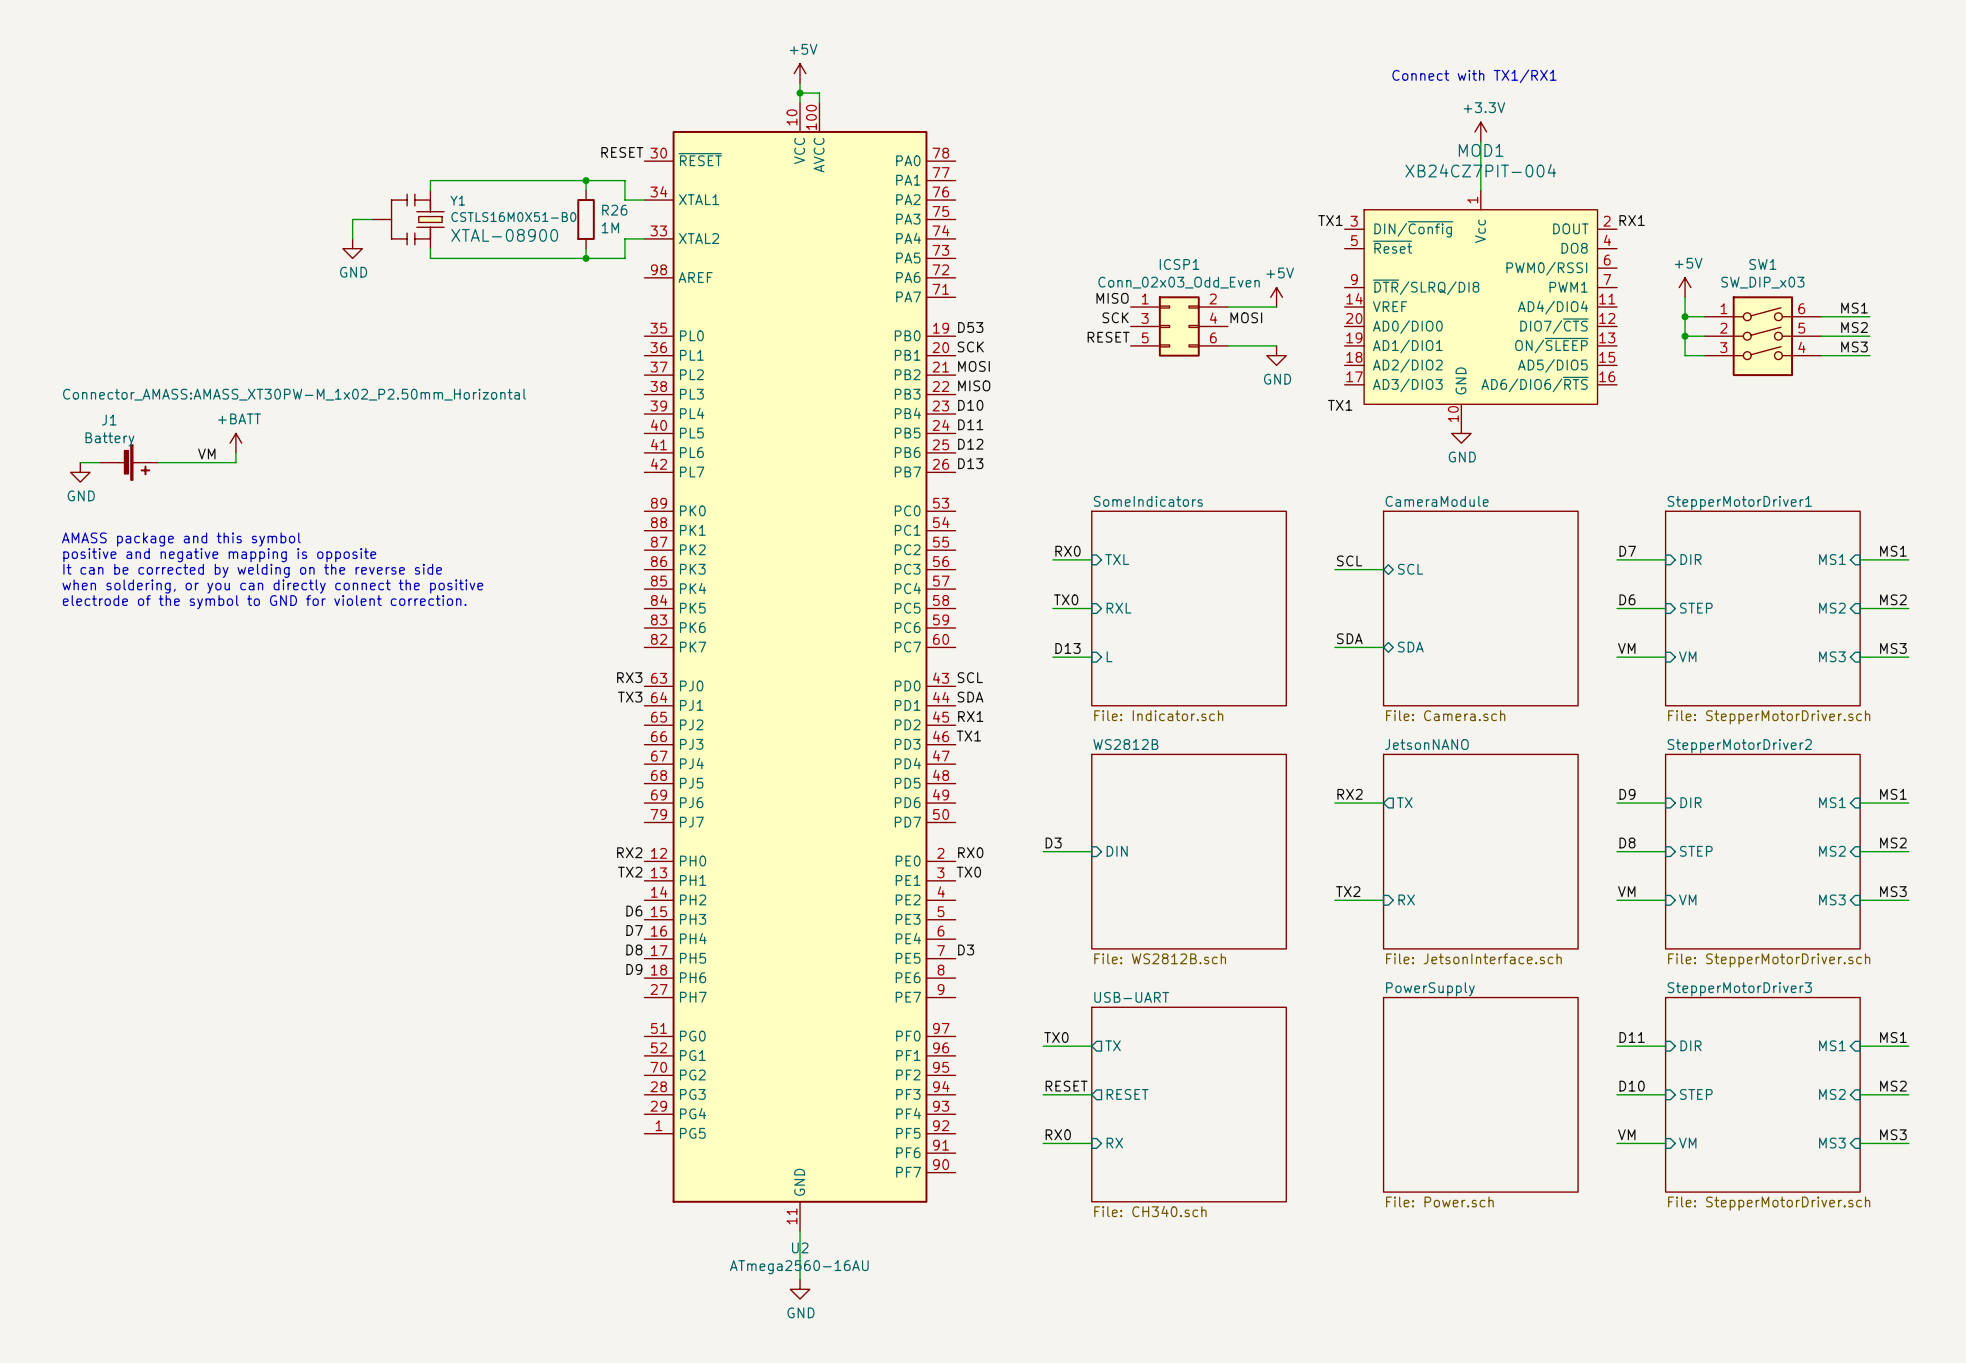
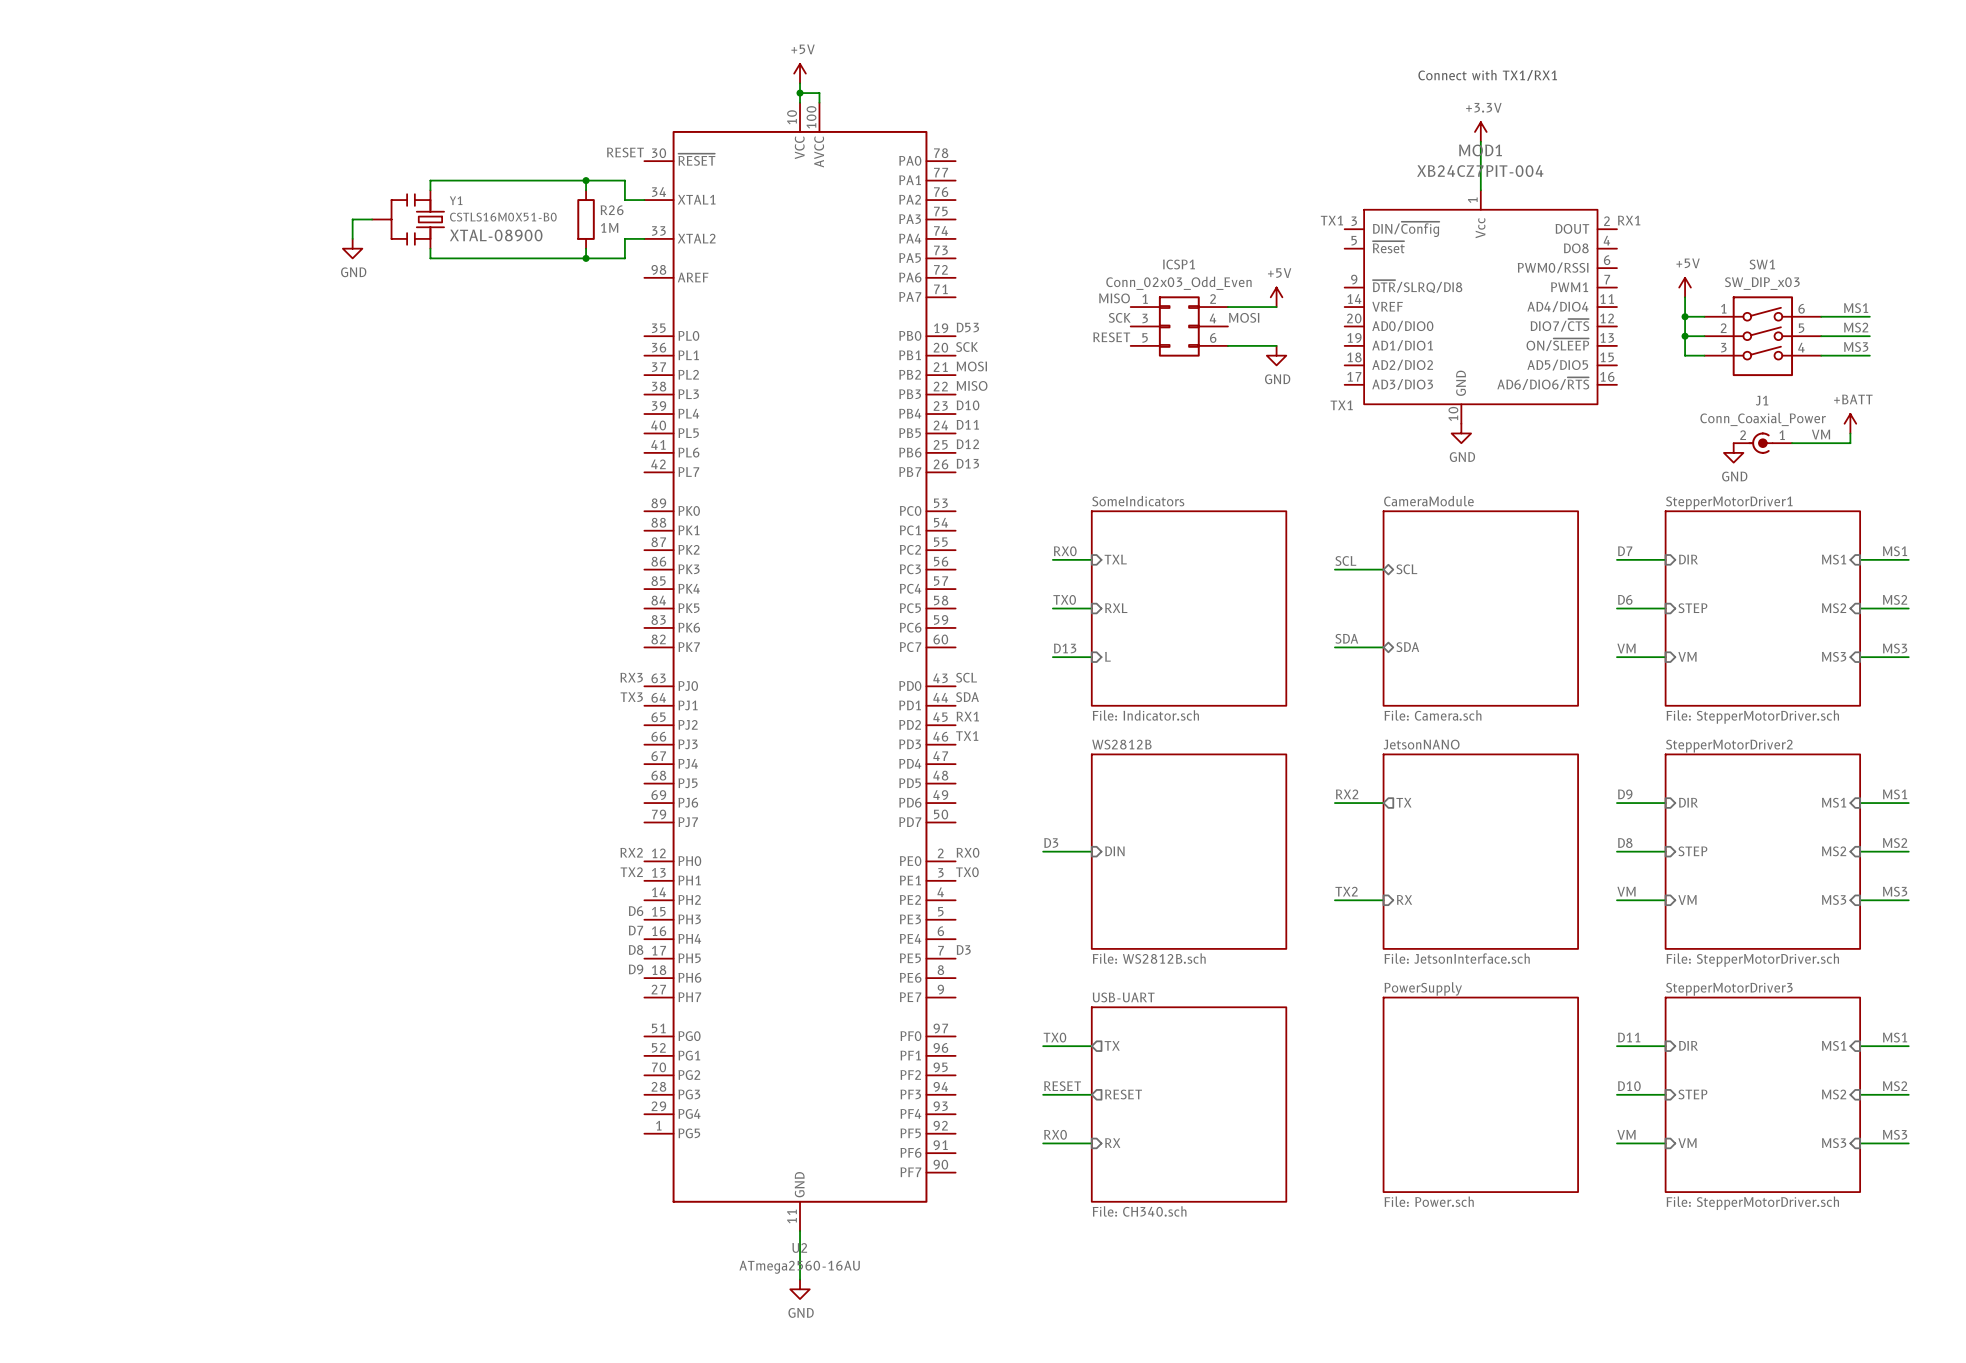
J1 text: Connector_AMASS:AMASS_XT30PW-M_1x02_P2.50mm_Horizontal (294, 394) -> none
J1 name position: J1 (109, 420) -> J1 (1762, 400)
power symbol: none -> +BATT (1850, 423)
wire: none -> (1850, 433) (1850, 443) (1792, 443)
label: none -> VM (1821, 434)
J1 value: Battery (109, 439) -> Conn_Coaxial_Power (1763, 419)
power symbol: +BATT (235, 443) -> none
J1 symbol: [99, 445, 159, 481] -> [1733, 432, 1793, 454]
wire: (235, 452) (235, 462) (158, 462) -> none
power symbol: none -> GND (1733, 452)
label: VM (206, 453) -> none
wire: (80, 462) (99, 462) -> none
power symbol: GND (80, 472) -> none
text: AMASS package and this symbol (181, 539) -> none
text: positive and negative mapping is opposite (219, 555) -> none
text: It can be corrected by welding on the reverse side (252, 570) -> none
text: when soldering, or you can directly connect the positive (272, 586) -> none
text: electrode of the symbol to GND for violent correction. (264, 602) -> none

